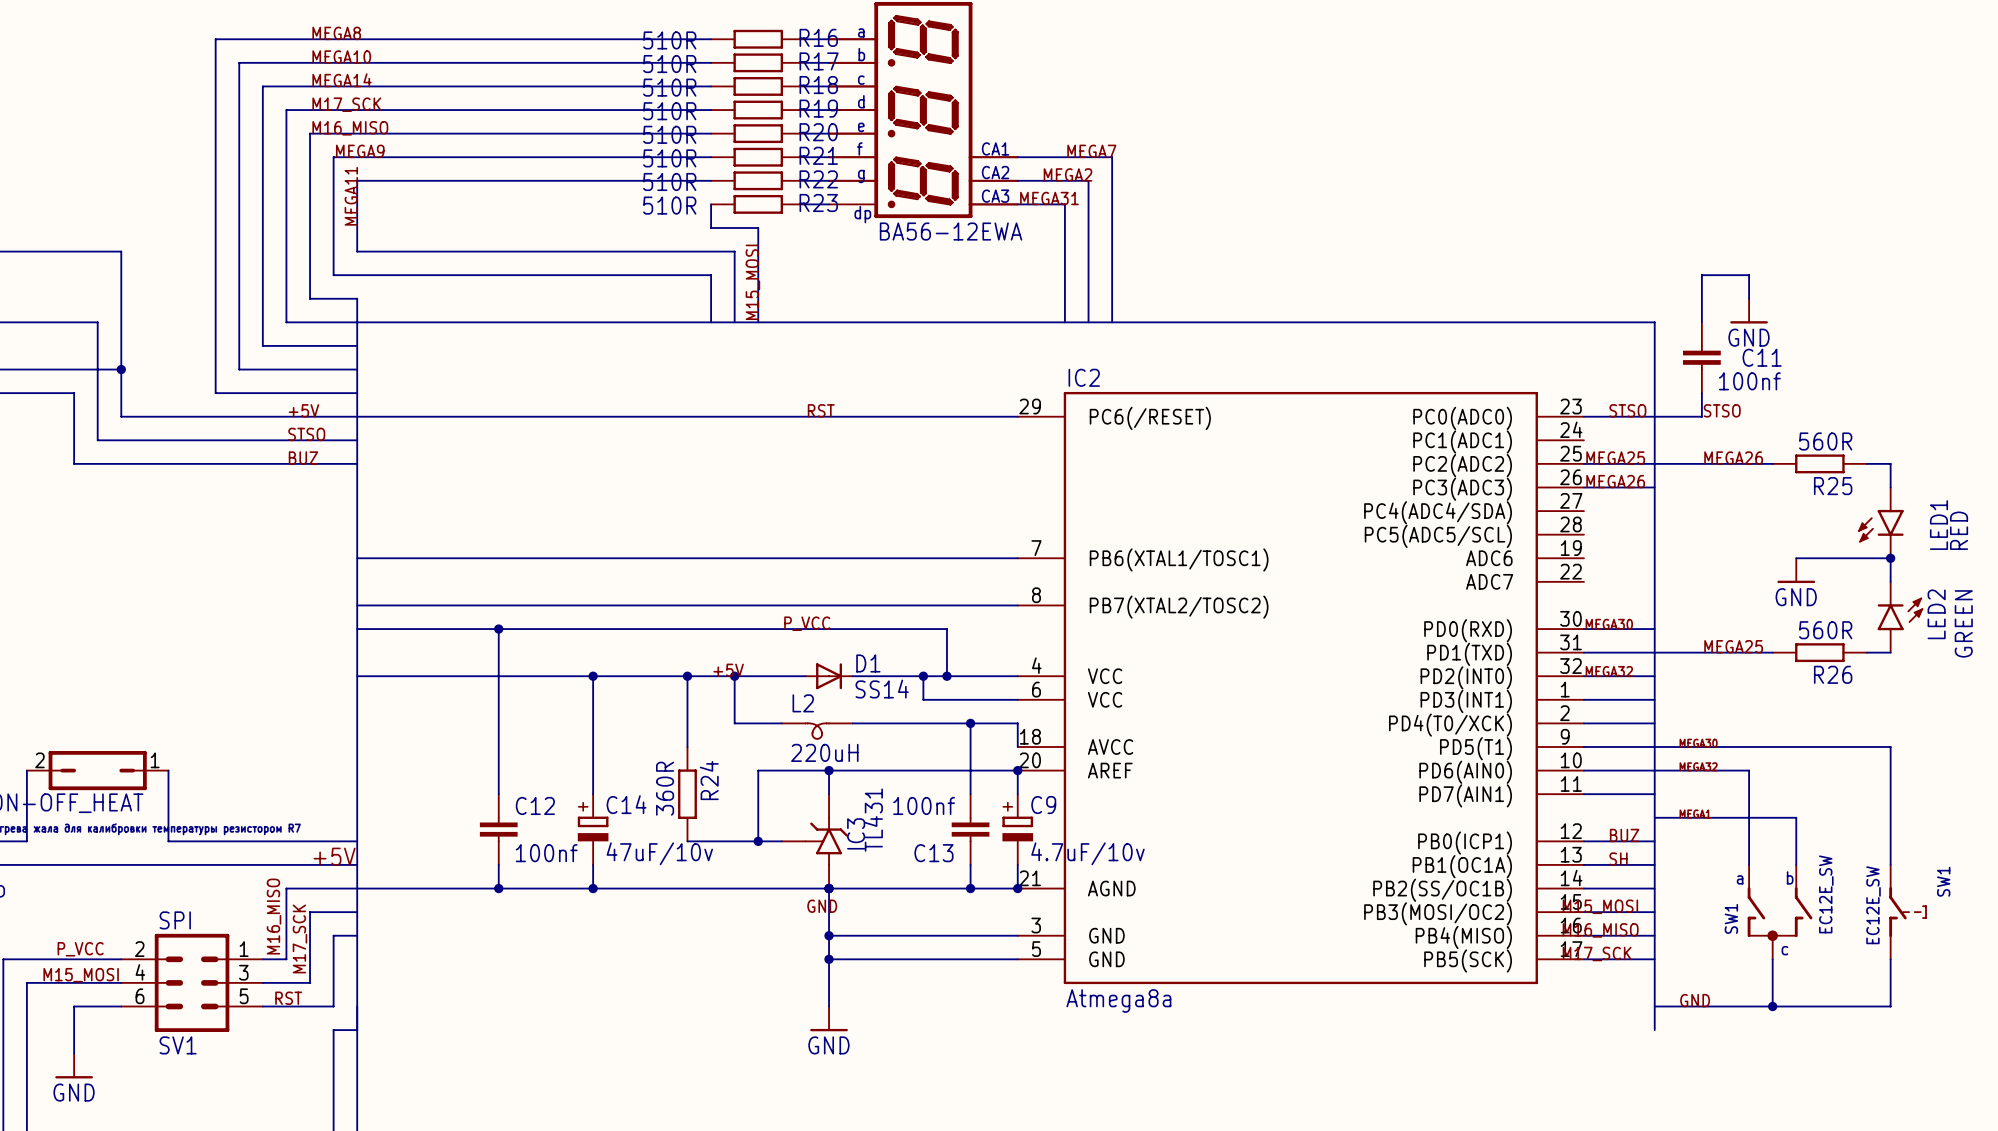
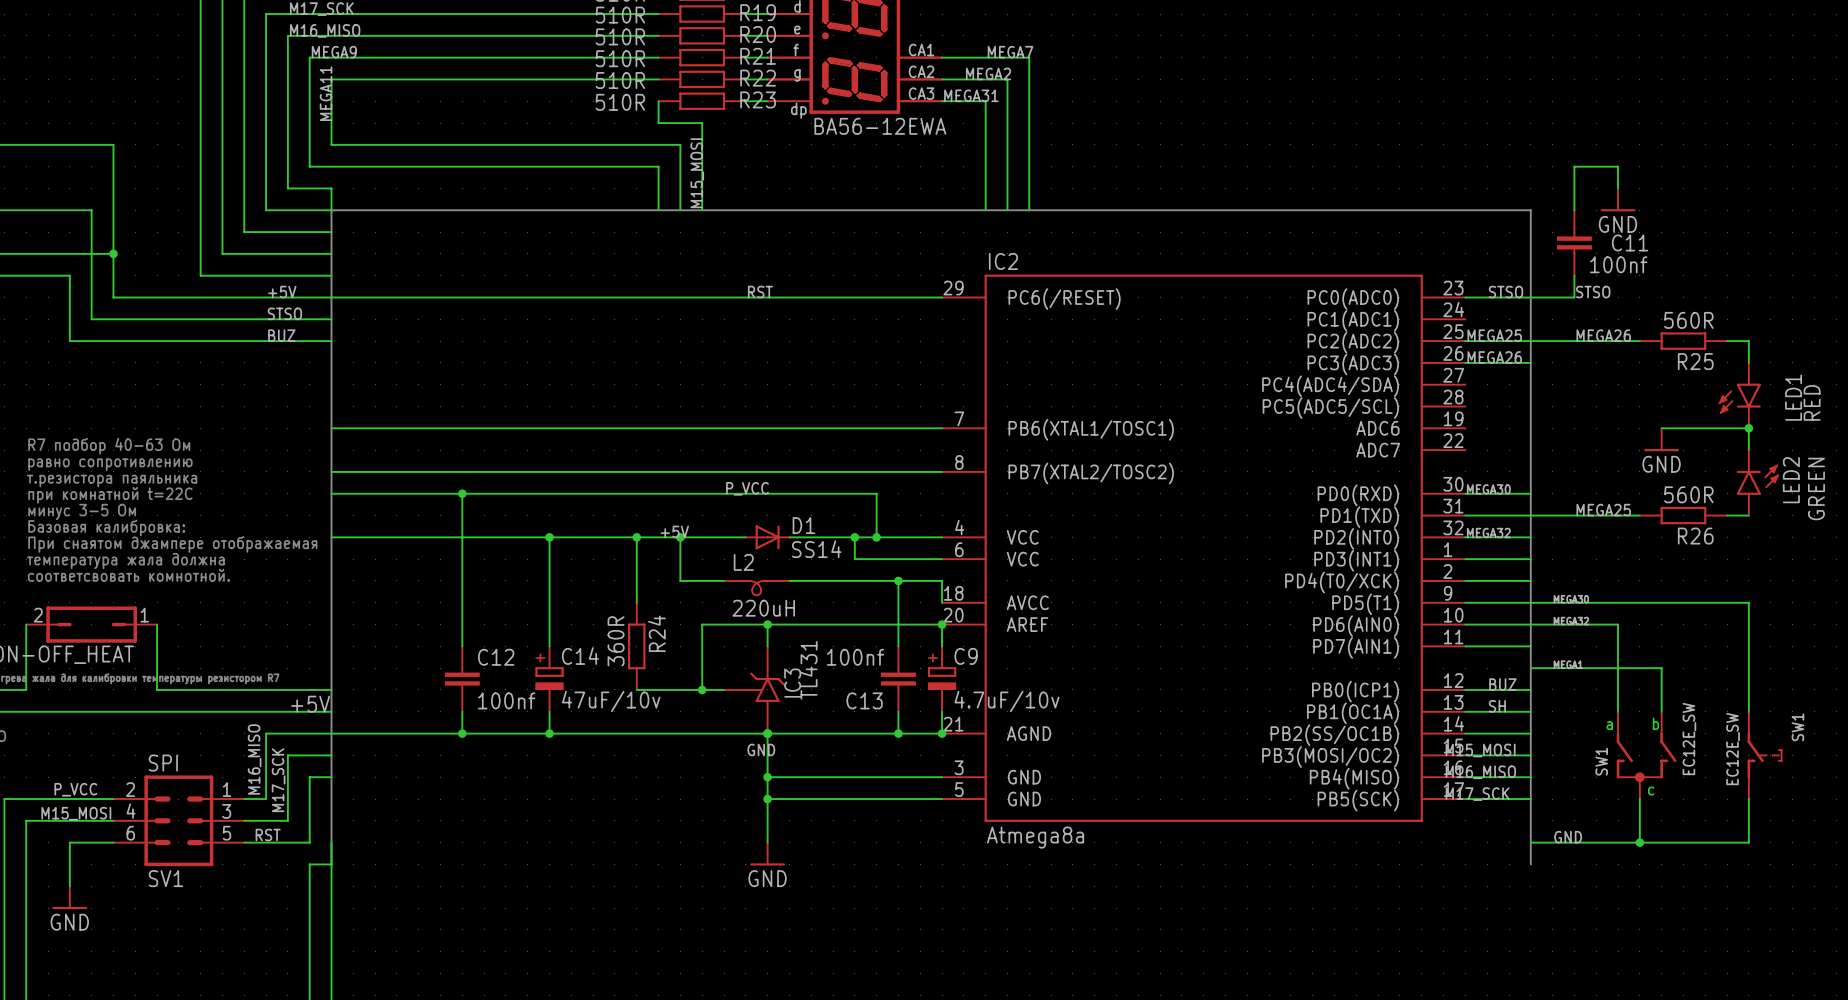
text: none -> R7 подбор 40-63 Ом (109, 446)
text: none -> равно сопротивлению (110, 464)
text: none -> т.резистора паяльника (112, 481)
text: none -> при комнатной t=22С (110, 495)
text: none -> минус 3-5 Ом (82, 511)
text: none -> Базовая калибровка: (106, 528)
text: none -> При снаятом джампере отображаемая (172, 544)
text: none -> температура жала должна (125, 560)
text: none -> соответсвовать комнотной. (128, 575)

